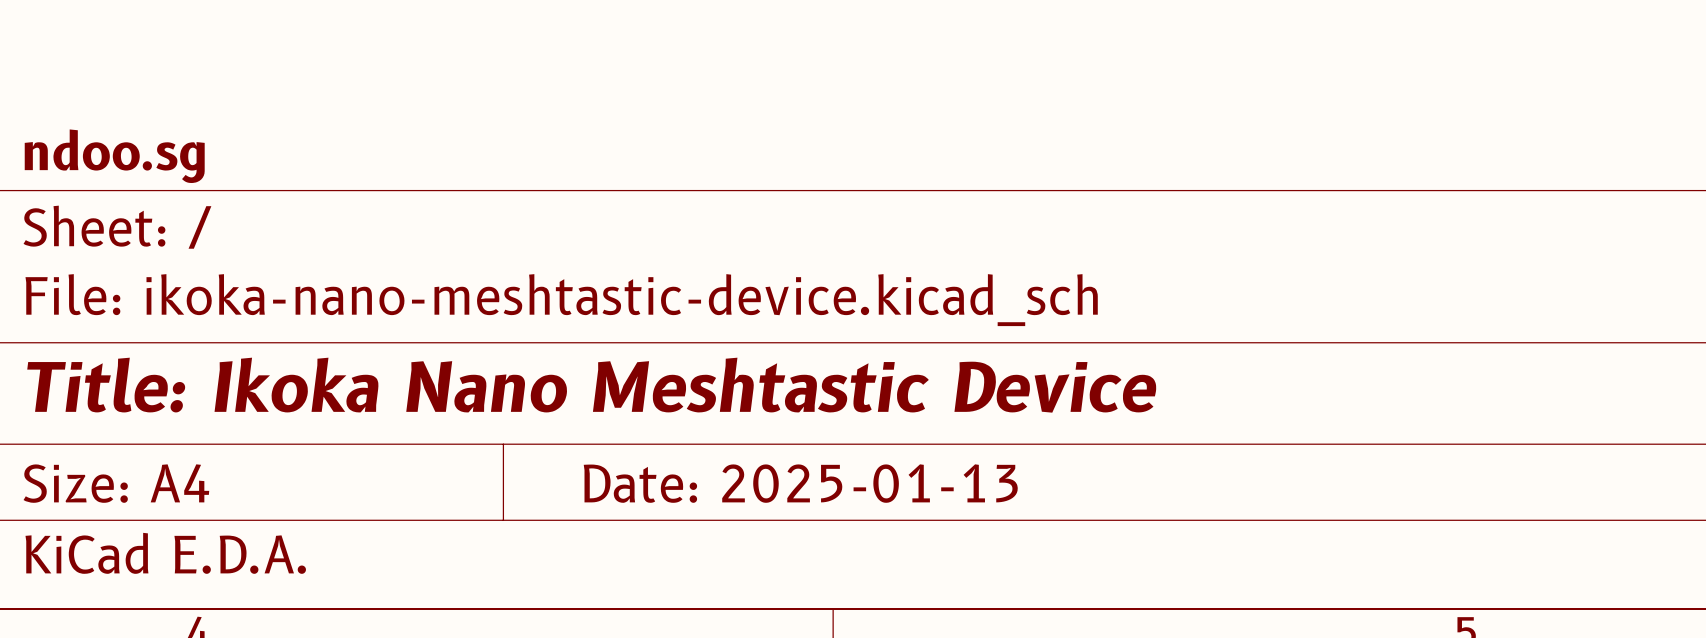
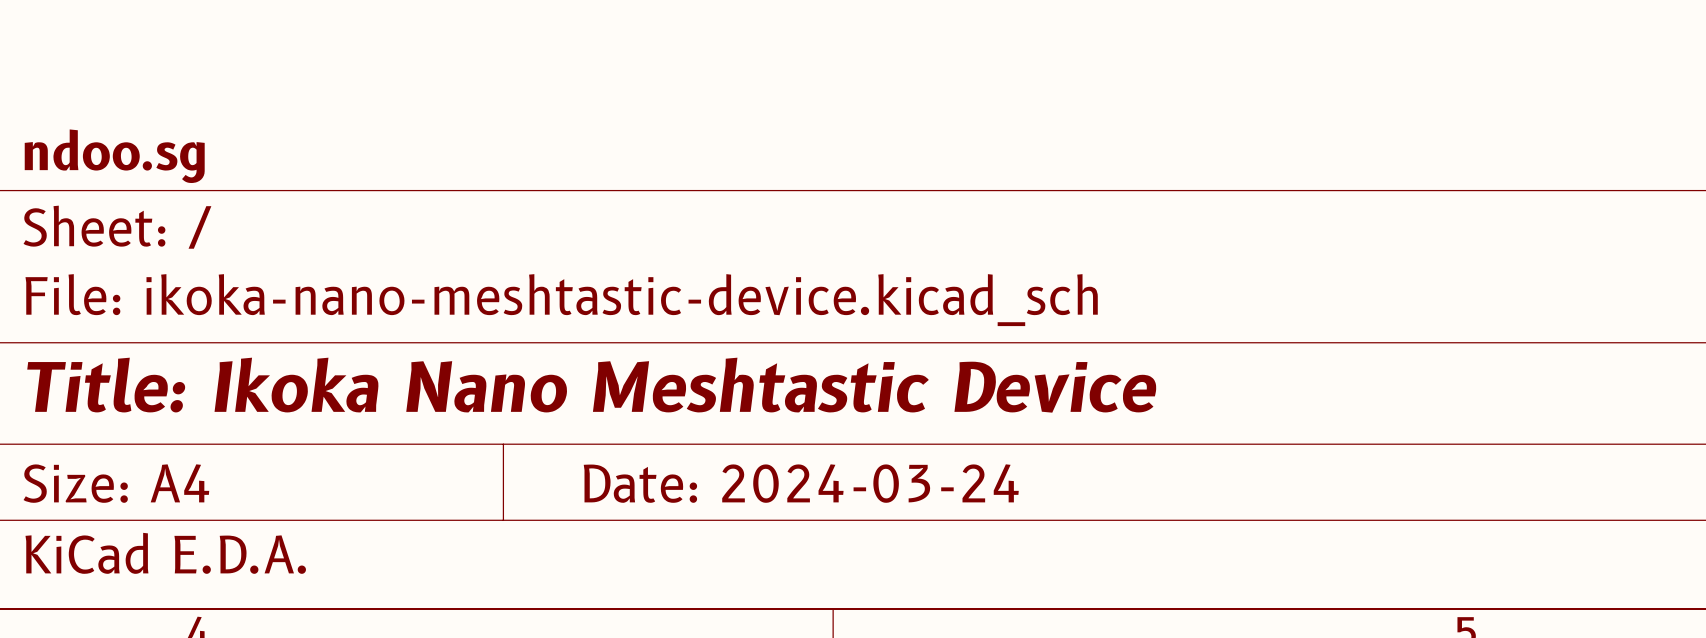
title block: Date: 2025-01-13 (800, 483) -> Date: 2024-03-24 (801, 483)

